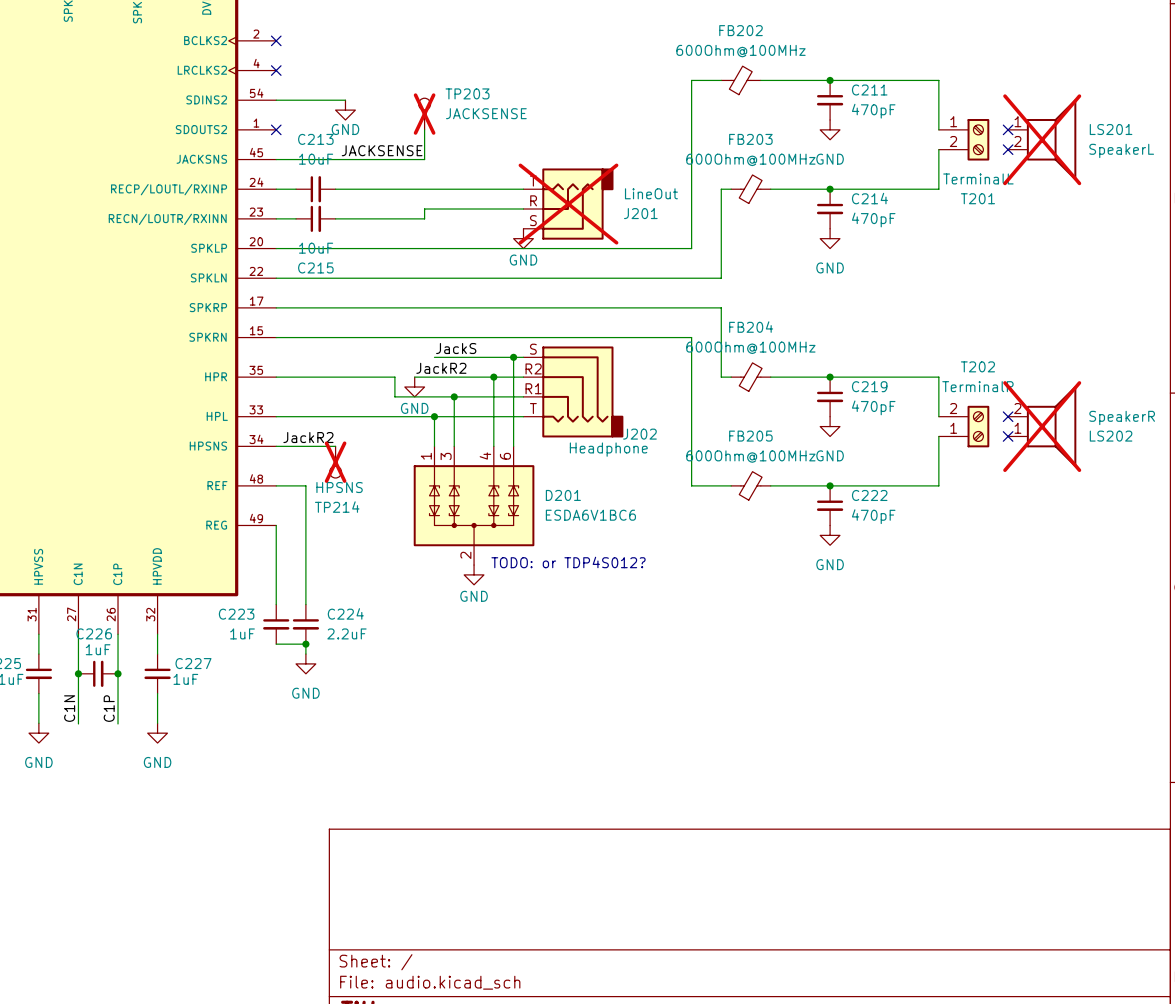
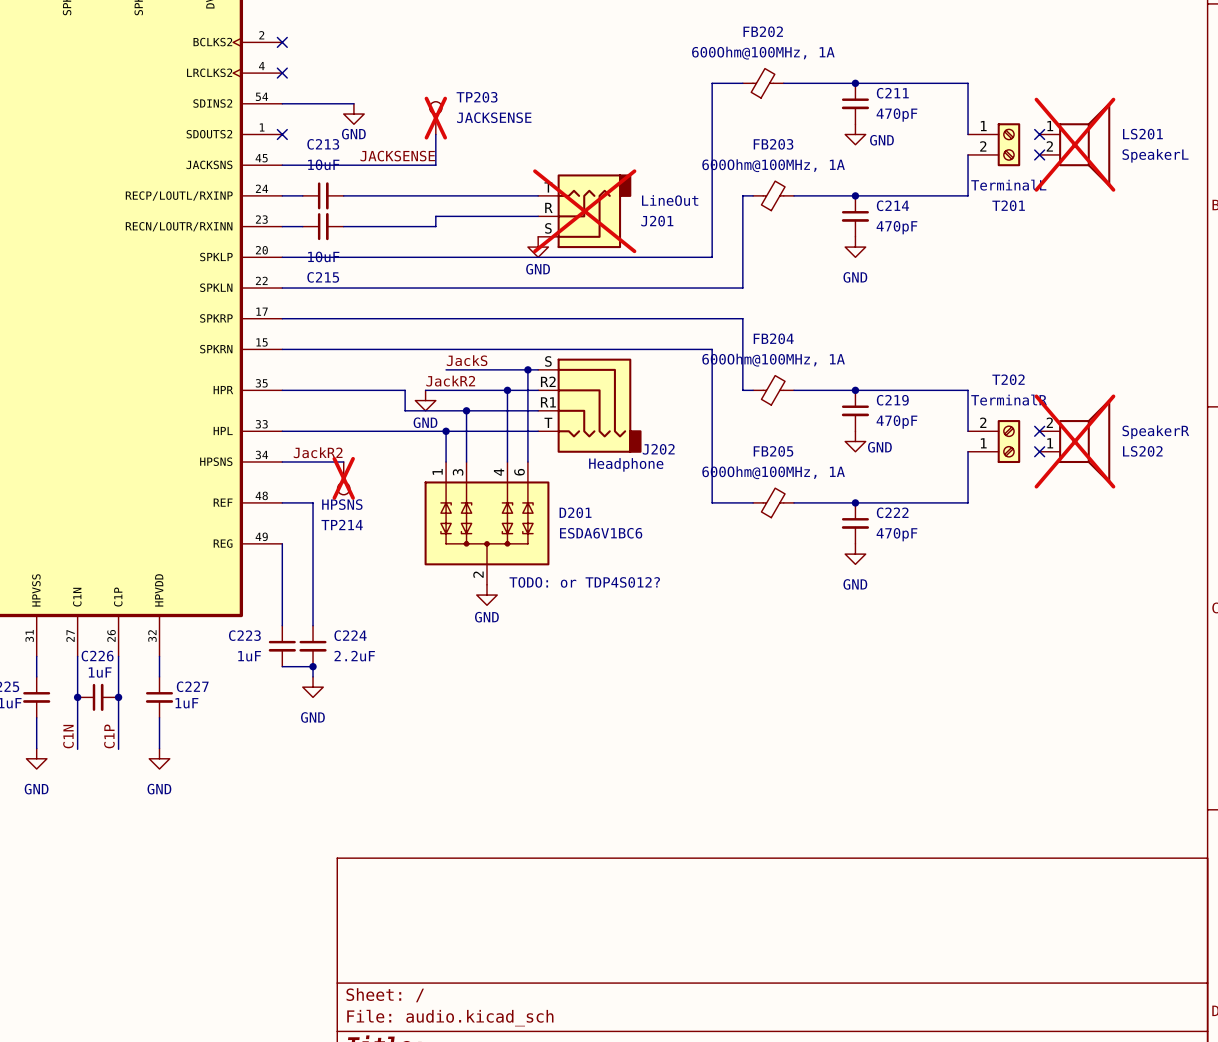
FB202 value: 600Ohm@100MHz (741, 51) -> 600Ohm@100MHz, 1A (763, 53)
FB203 value: 600Ohm@100MHz (750, 159) -> 600Ohm@100MHz, 1A (773, 165)
power symbol text position: GND (830, 159) -> GND (881, 140)
FB204 value: 600Ohm@100MHz (750, 347) -> 600Ohm@100MHz, 1A (773, 360)
power symbol text position: GND (830, 455) -> GND (879, 447)
FB205 value: 600Ohm@100MHz (750, 456) -> 600Ohm@100MHz, 1A (773, 472)

